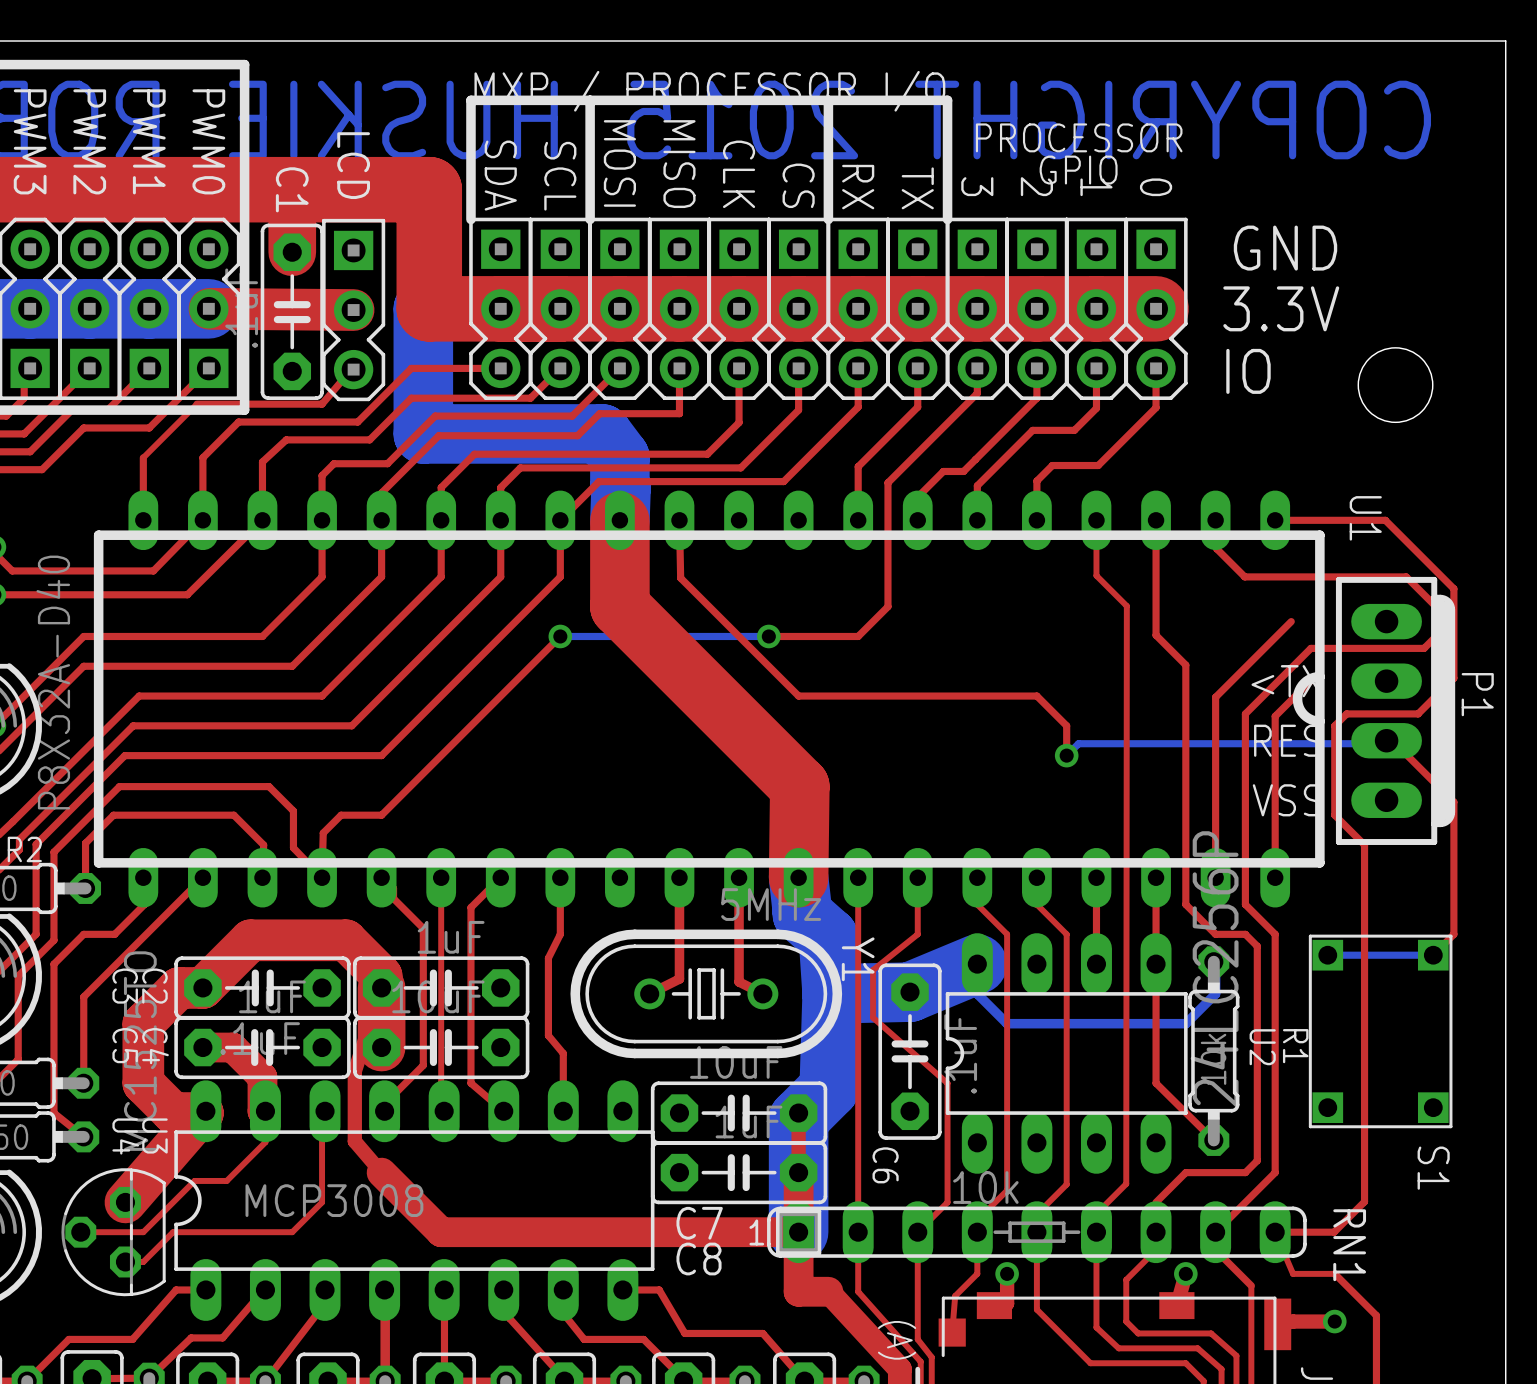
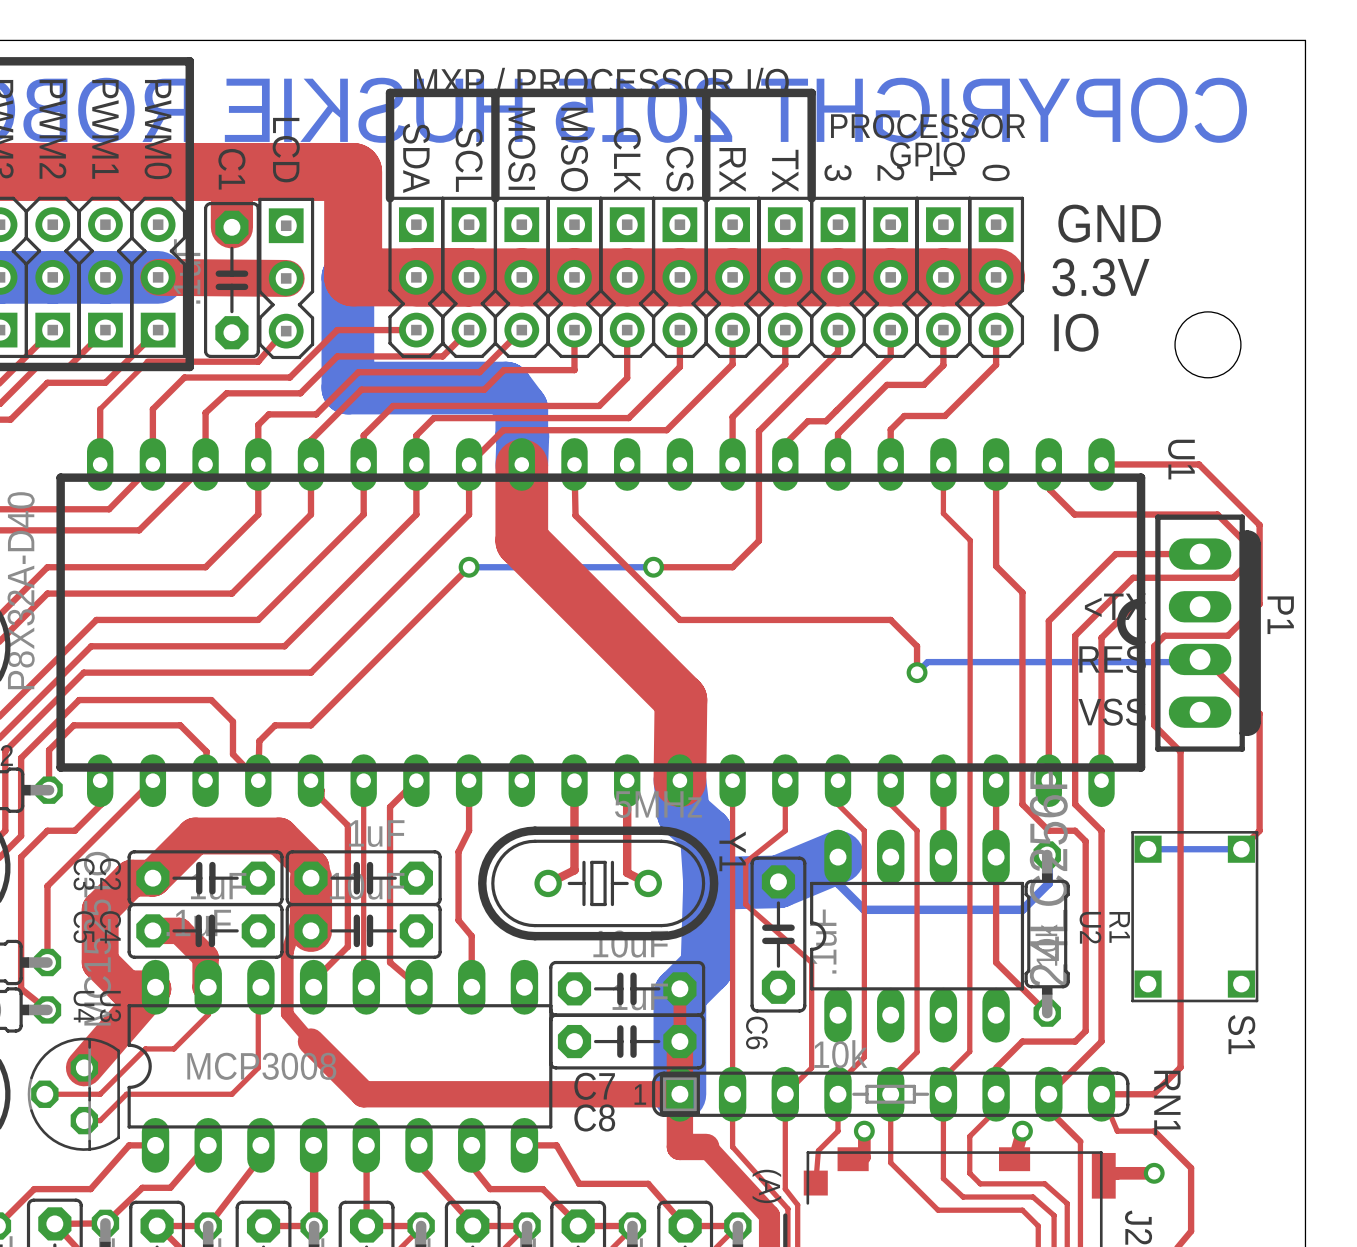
top track: none -> (1115, 554) (1203, 554)

